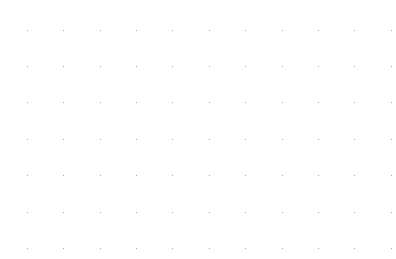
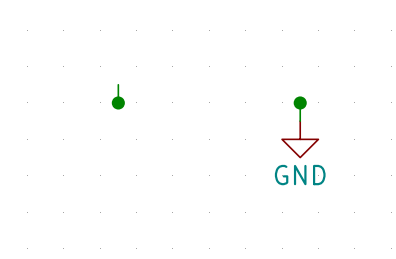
wire: none -> (118, 84) (118, 102)
junction: none -> (118, 102)
wire: none -> (300, 102) (300, 121)
junction: none -> (300, 102)
power symbol: none -> GND (300, 139)

